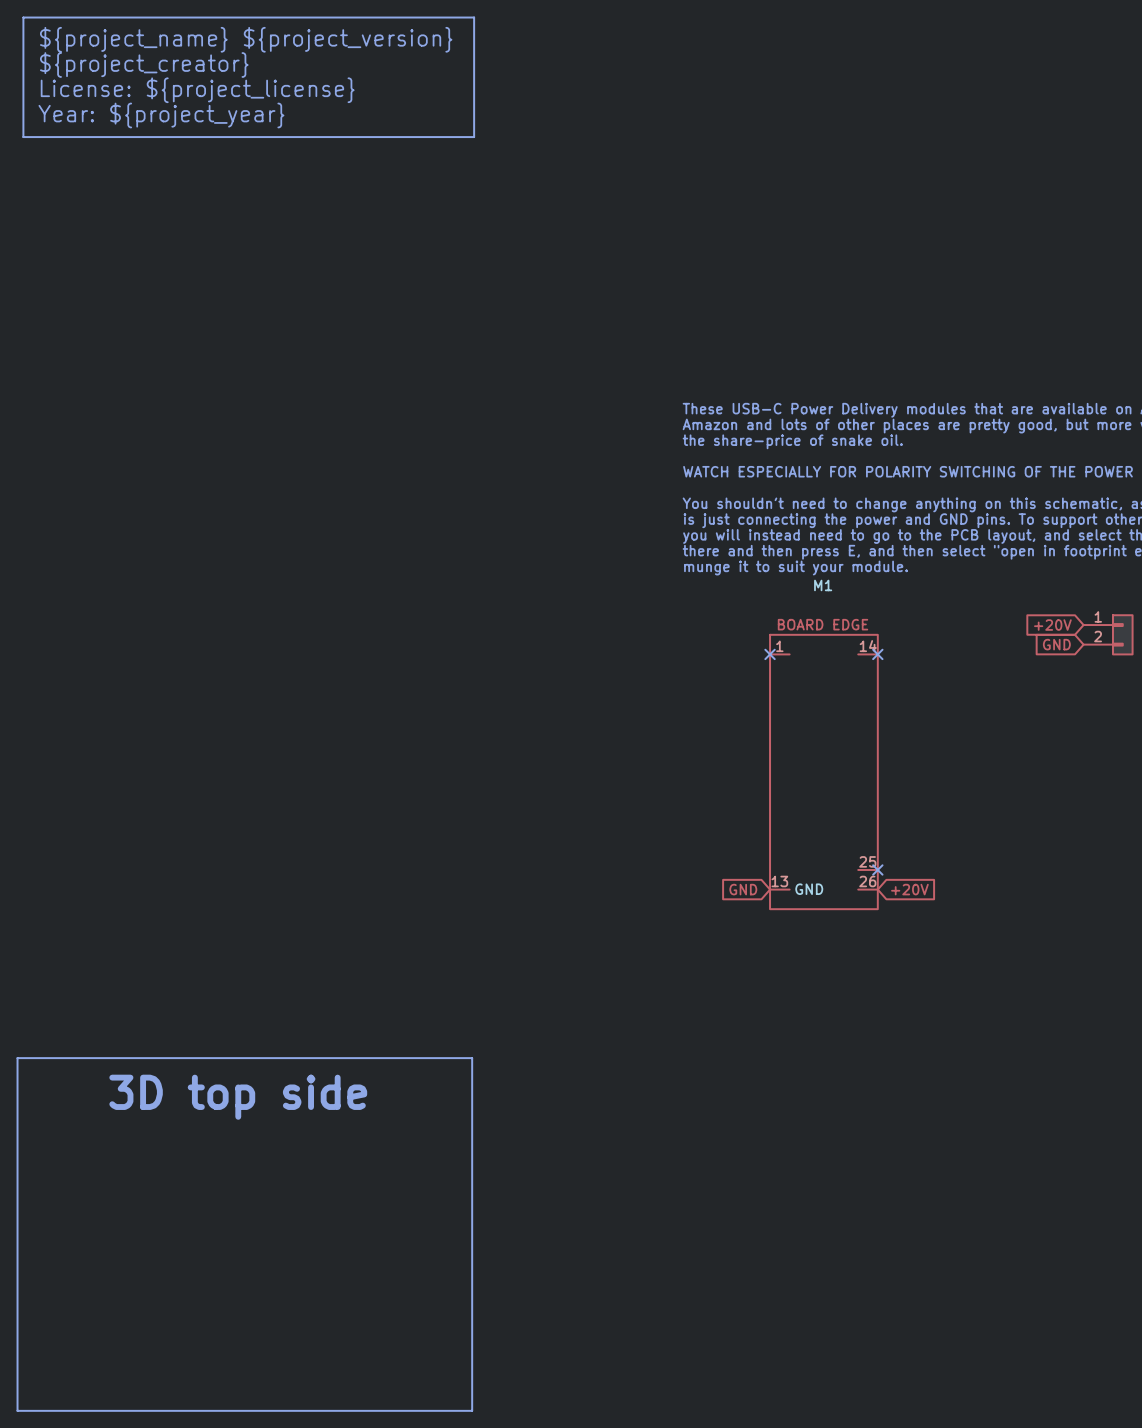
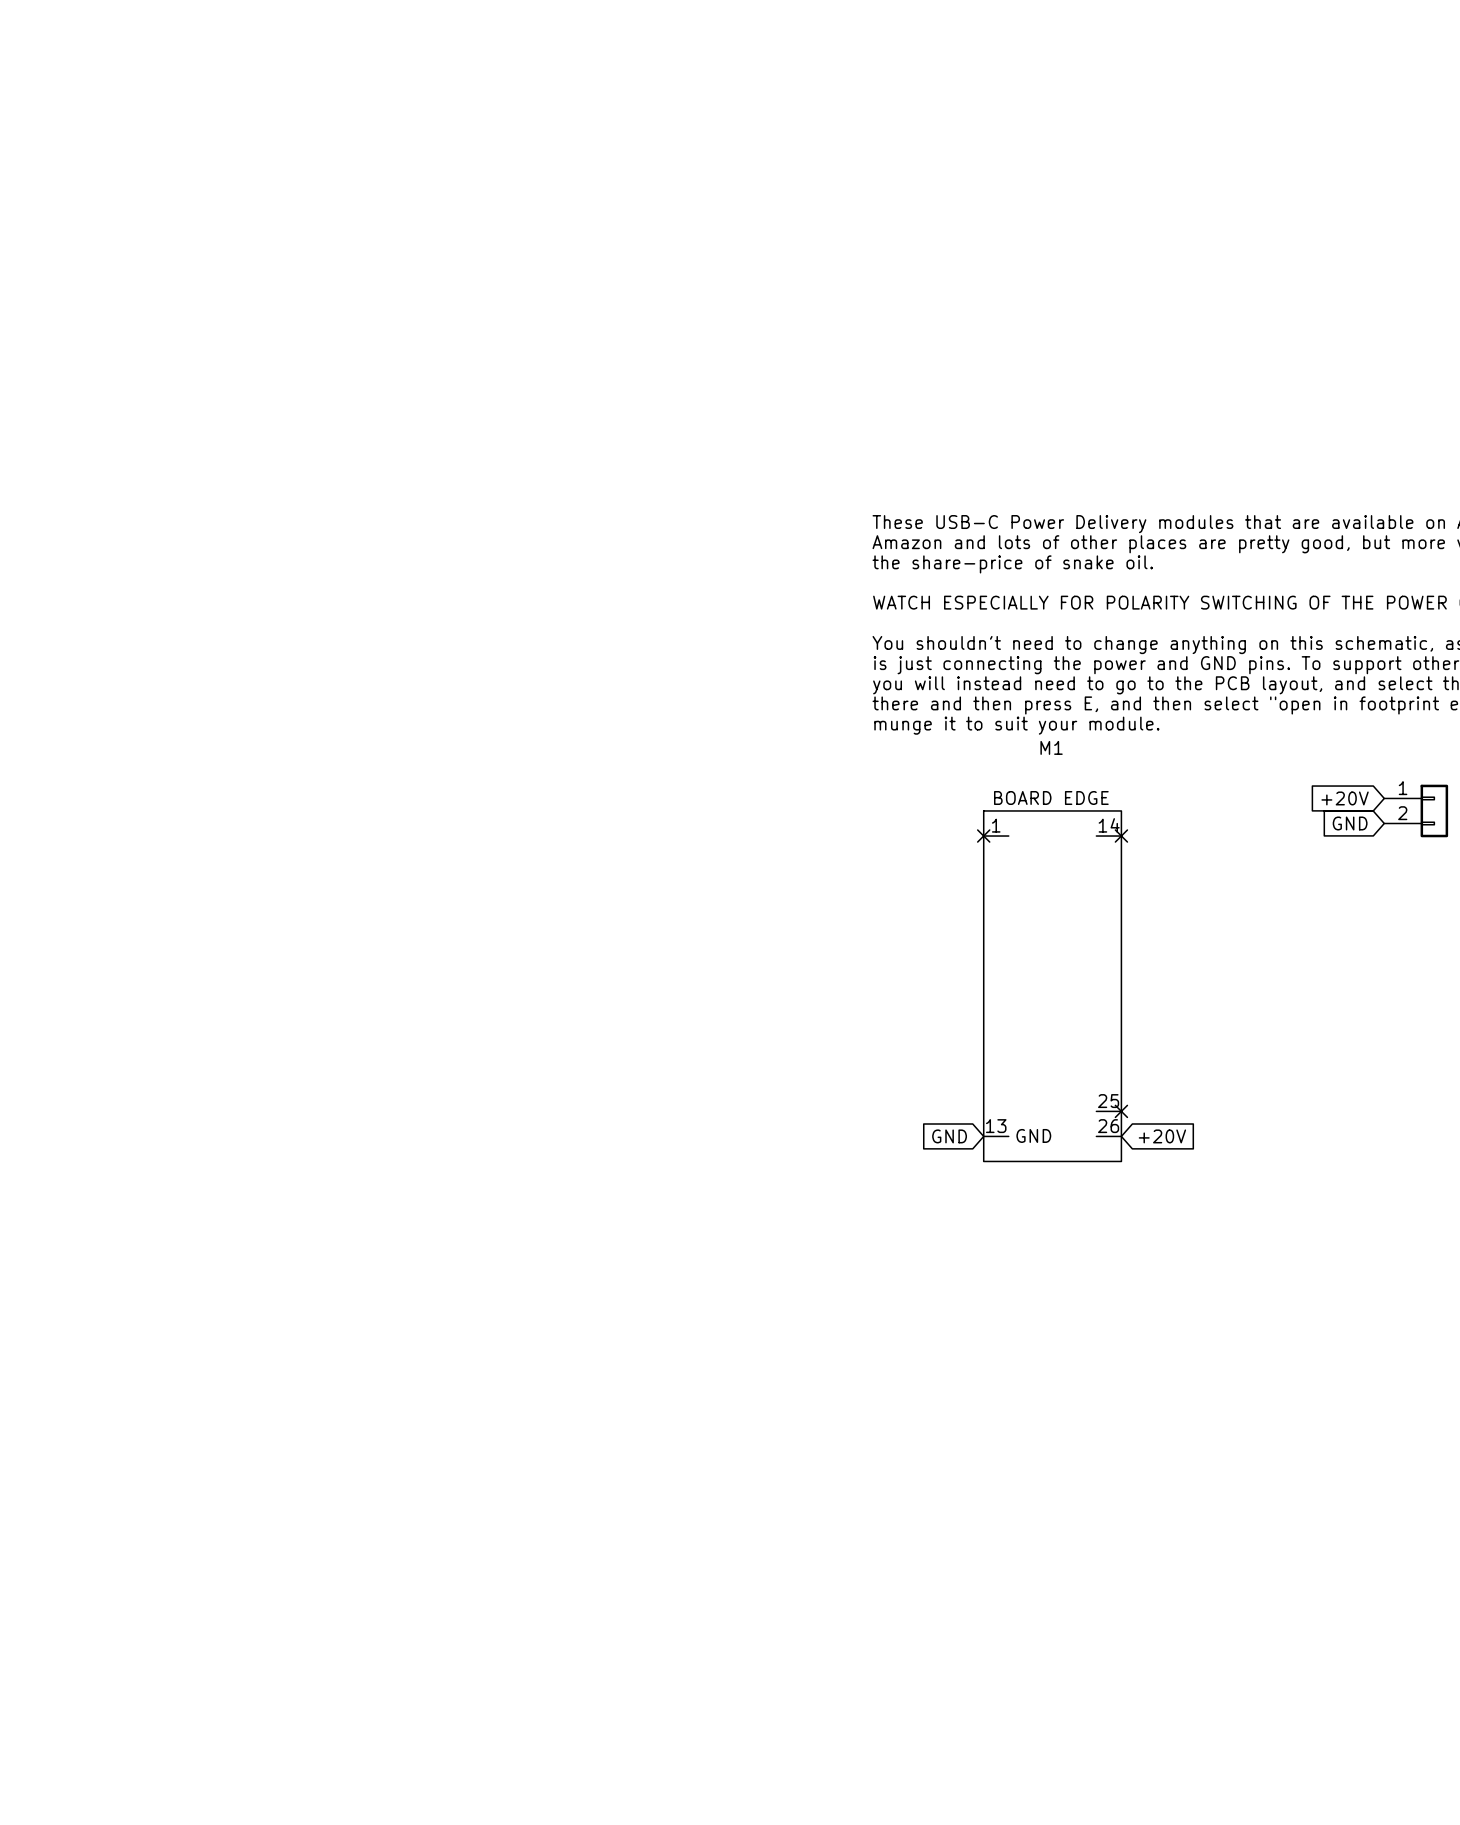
line: (23, 17) (474, 17) (474, 137) (23, 137) (23, 17) -> none
text: ${project_name} ${project_version} (246, 39) -> none
text: ${project_creator} (144, 65) -> none
text: License: ${project_license} (197, 90) -> none
text: Year: ${project_year} (161, 115) -> none
line: (17, 1058) (472, 1058) (472, 1410) (17, 1410) (17, 1058) -> none
text: 3D top side (238, 1097) -> none

